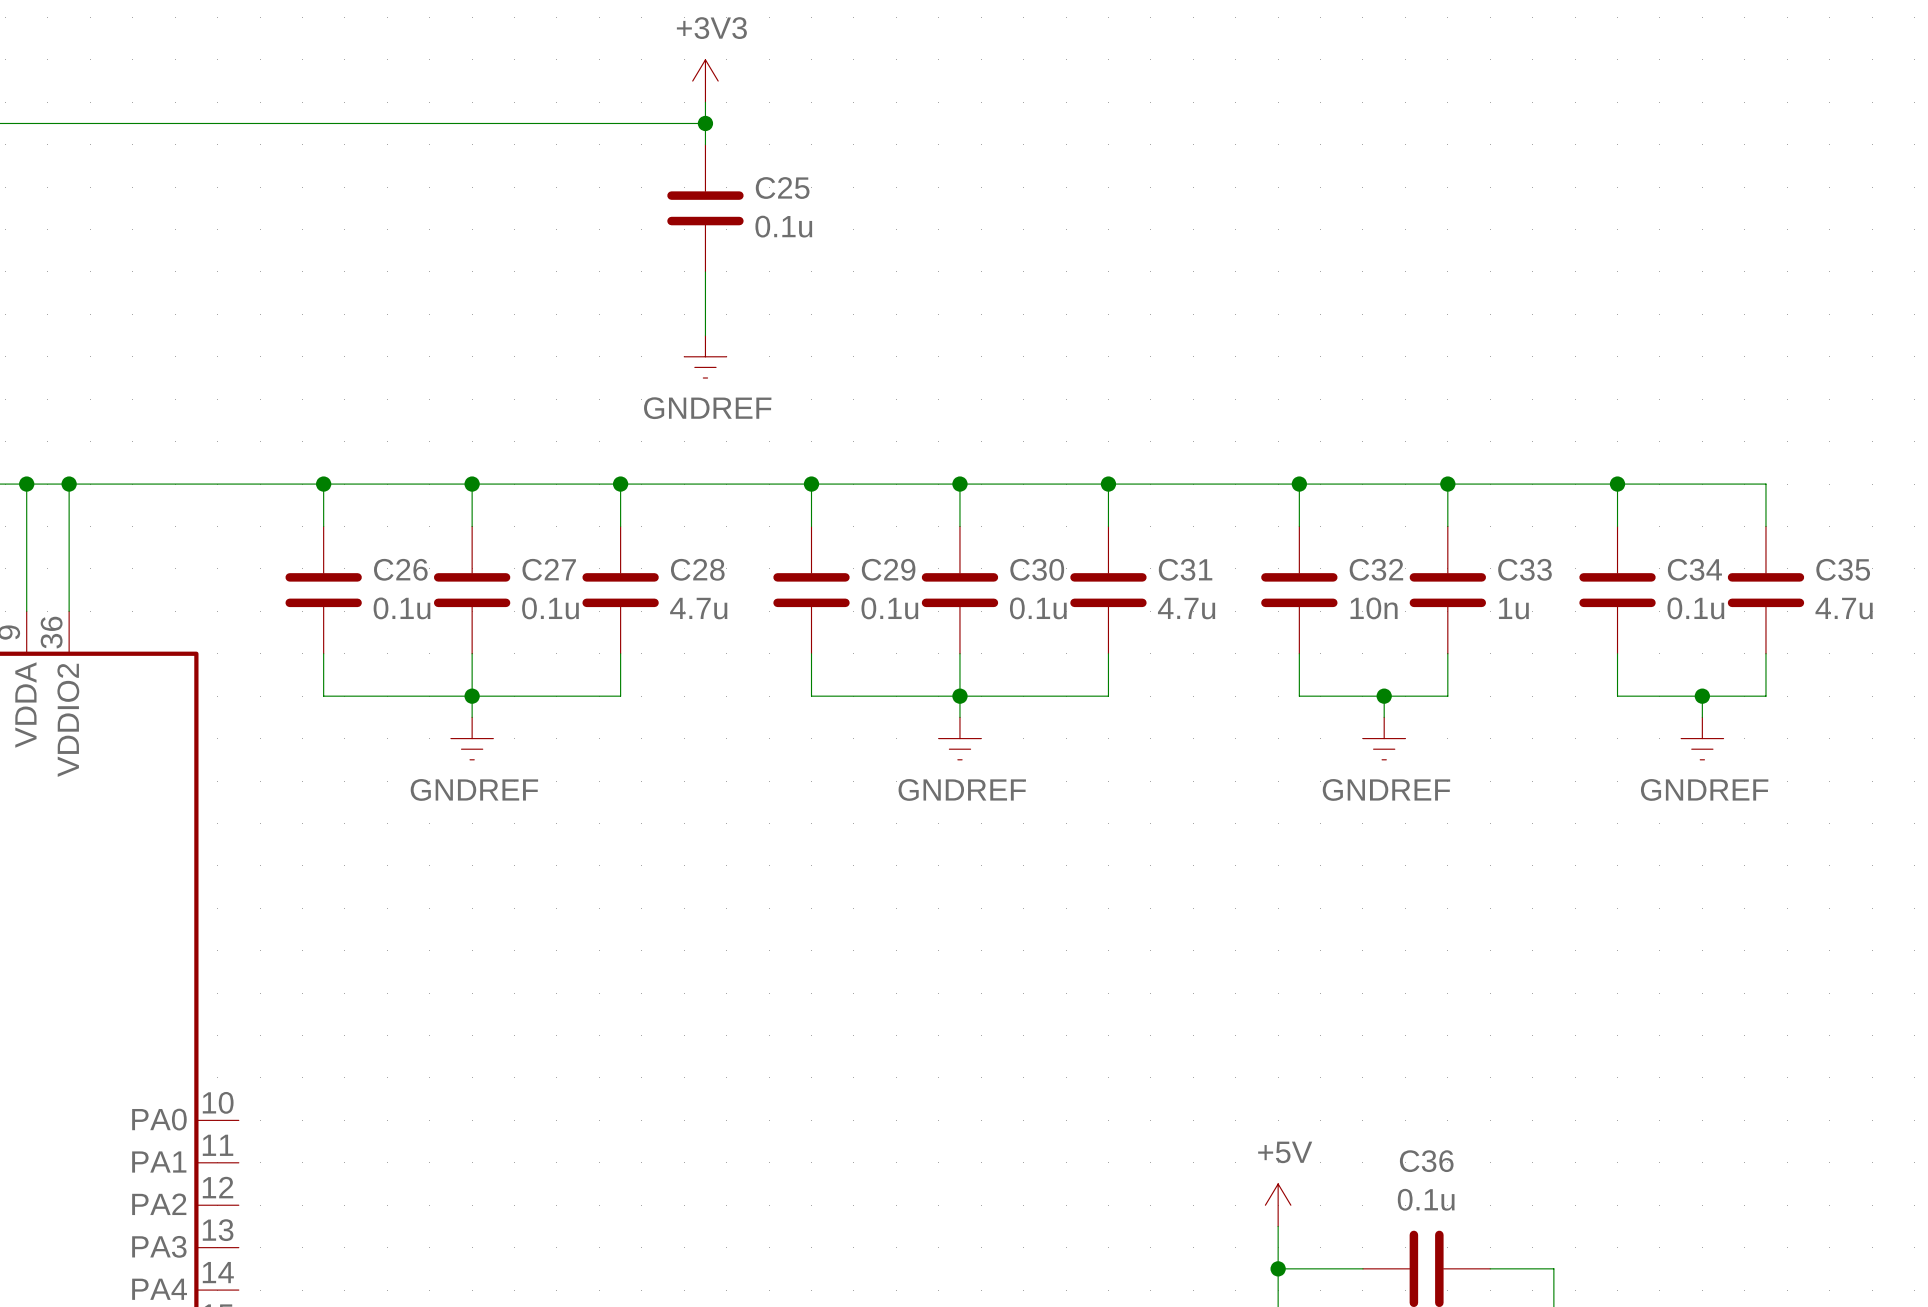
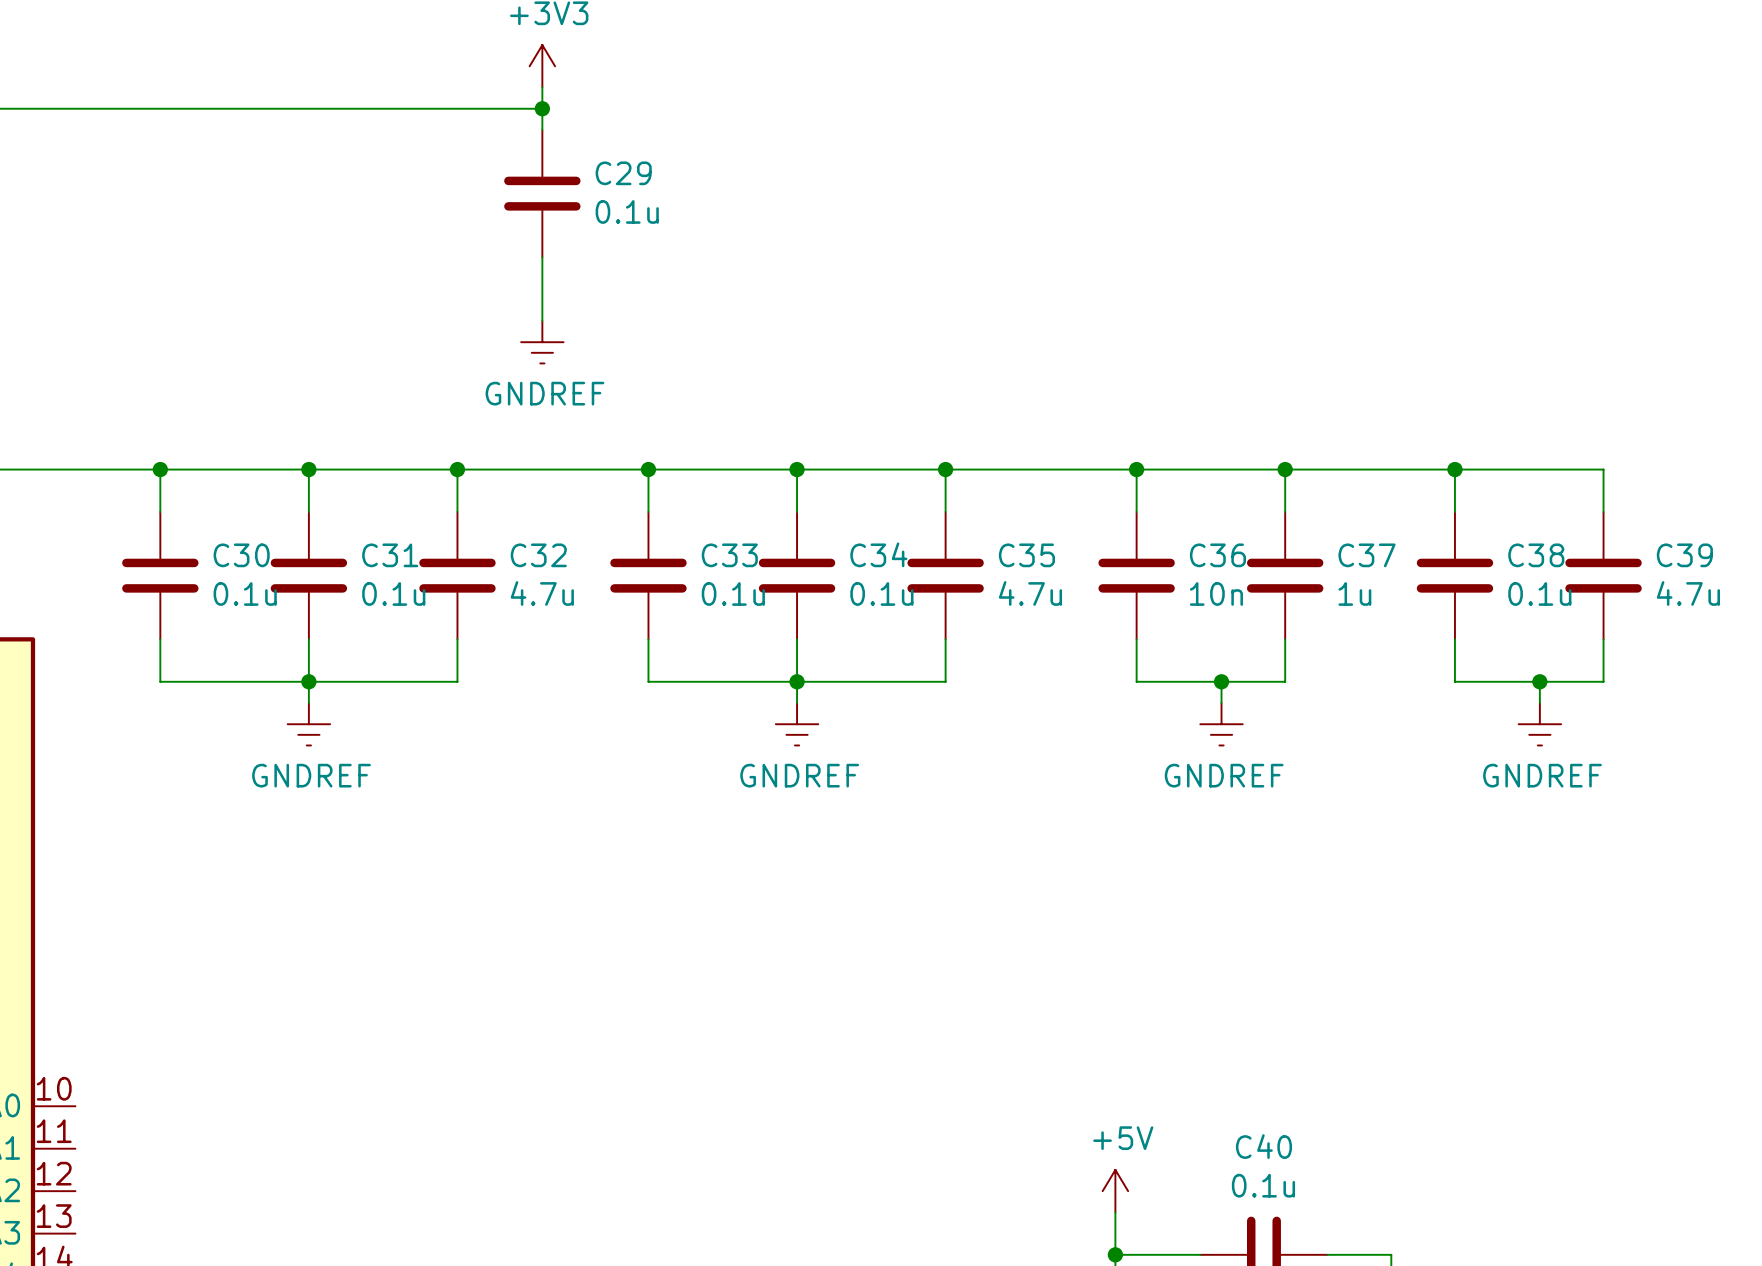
C25 name: C25 (782, 188) -> C29 (623, 173)
C26 name: C26 (400, 569) -> C30 (241, 555)
C27 name: C27 (549, 569) -> C31 (390, 555)
C28 name: C28 (697, 569) -> C32 (538, 555)
C29 name: C29 (888, 569) -> C33 (729, 555)
C30 name: C30 (1037, 569) -> C34 (878, 554)
C31 name: C31 (1185, 569) -> C35 (1026, 555)
C32 name: C32 (1376, 569) -> C36 (1217, 555)
C33 name: C33 (1524, 569) -> C37 (1367, 555)
C34 name: C34 (1694, 569) -> C38 (1536, 555)
C35 name: C35 (1843, 569) -> C39 (1684, 555)
C36 name: C36 (1426, 1161) -> C40 (1263, 1146)

